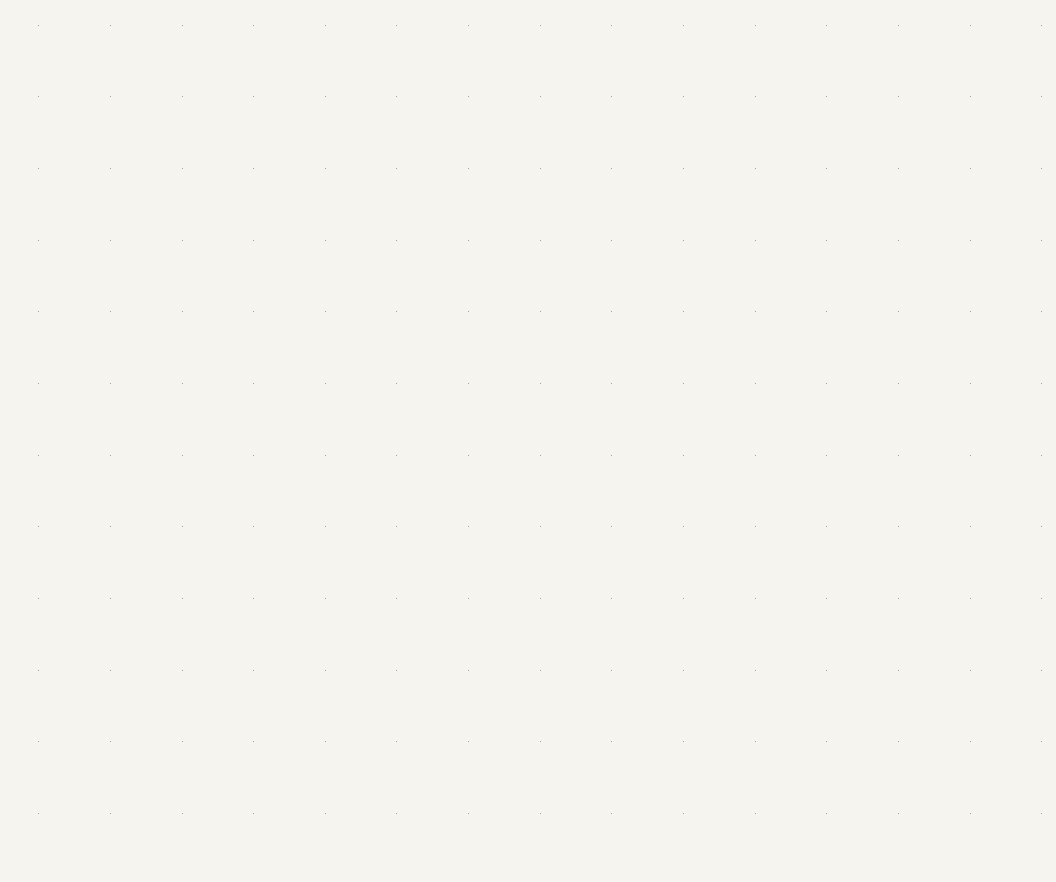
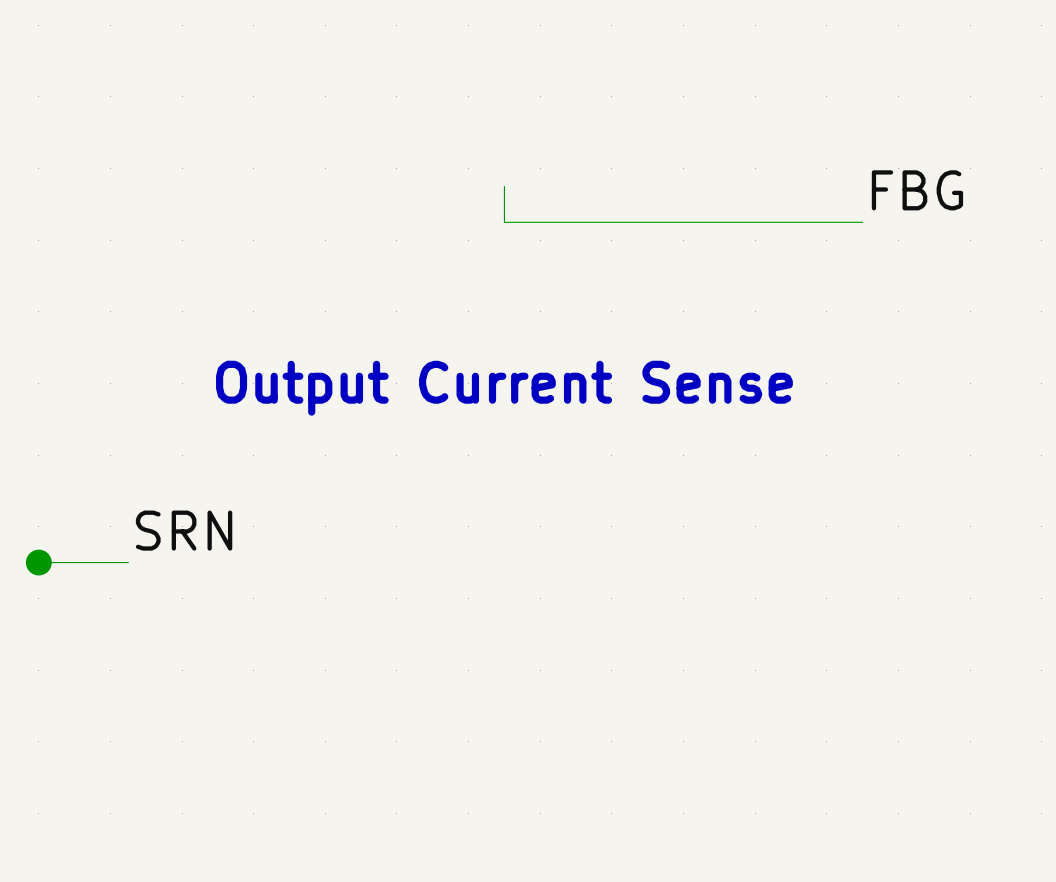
wire: none -> (504, 186) (504, 222) (862, 222)
label: none -> FBG (917, 190)
text: none -> Output Current Sense (504, 388)
label: none -> SRN (184, 530)
wire: none -> (38, 562) (128, 562)
junction: none -> (38, 562)

